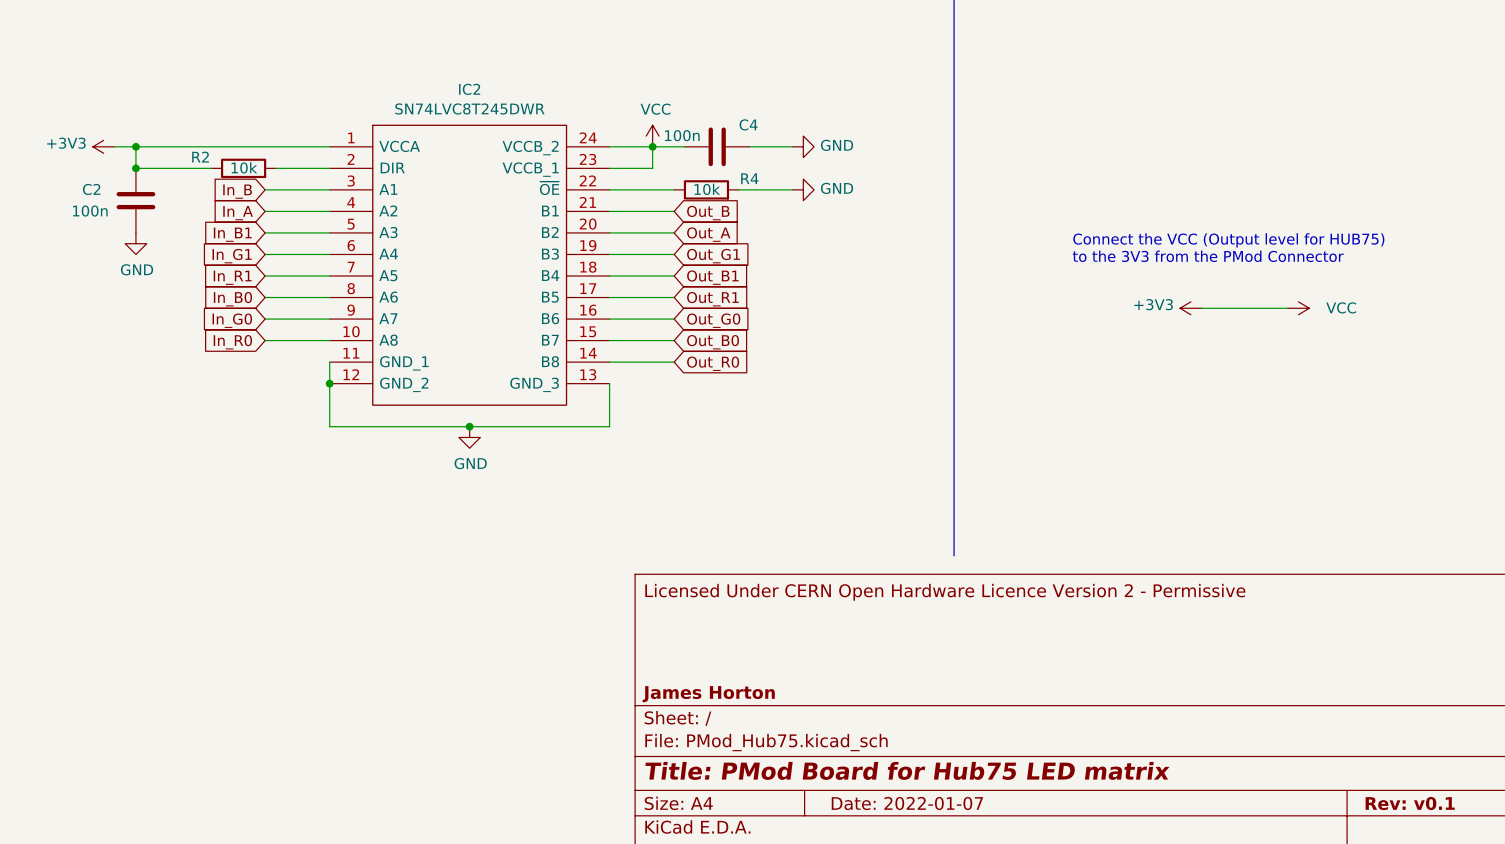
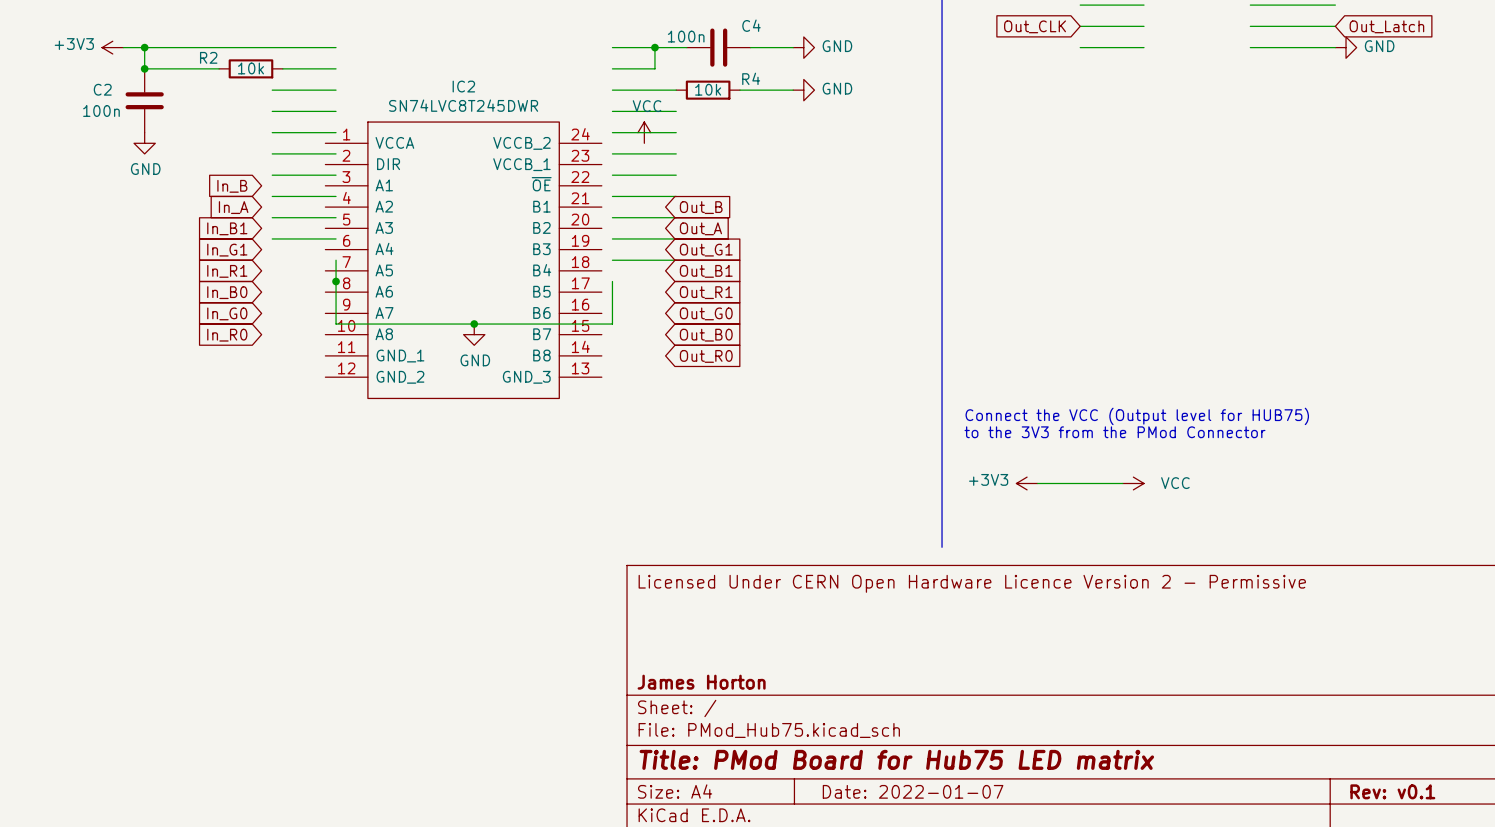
wire: none -> (1080, 5) (1144, 5)
wire: none -> (1250, 5) (1335, 5)
wire: none -> (1080, 26) (1144, 26)
wire: none -> (1250, 26) (1335, 26)
global label: none -> Out_Latch (1386, 26)
global label: none -> Out_CLK (1035, 26)
junction: none -> (144, 47)
junction: none -> (654, 47)
power symbol: none -> GND (803, 47)
wire: none -> (1080, 47) (1144, 47)
wire: none -> (1250, 47) (1335, 47)
power symbol: none -> GND (1346, 47)
junction: none -> (144, 68)
power symbol: none -> GND (803, 90)
power symbol position: +3V3 (103, 146) -> +3V3 (112, 47)
wire: (114, 146) (329, 146) -> (123, 47) (336, 47)
wire: (135, 146) (135, 168) (211, 168) -> (144, 47) (144, 68) (219, 68)
junction: (135, 146) -> none
wire: (609, 146) (684, 146) -> (612, 47) (686, 47)
wire: (652, 146) (652, 168) (609, 168) -> (654, 47) (654, 68) (612, 68)
junction: (652, 146) -> none
C4 position: (717, 146) -> (718, 47)
wire: (749, 146) (792, 146) -> (750, 47) (793, 47)
power symbol: GND (803, 146) -> none
junction: (135, 168) -> none
R2 position: (243, 168) -> (250, 68)
wire: (275, 168) (329, 168) -> (282, 68) (336, 68)
wire: (265, 189) (329, 189) -> (272, 90) (336, 90)
wire: (609, 189) (674, 189) -> (612, 90) (676, 90)
R4 position: (706, 189) -> (708, 90)
wire: (738, 189) (792, 189) -> (740, 90) (793, 90)
power symbol: GND (803, 189) -> none
C2 position: (135, 200) -> (144, 100)
wire: (265, 211) (329, 211) -> (272, 111) (336, 111)
wire: (609, 211) (674, 211) -> (612, 111) (676, 111)
wire: (265, 232) (329, 232) -> (272, 132) (336, 132)
wire: (609, 232) (674, 232) -> (612, 132) (676, 132)
text position: Connect the VCC (Output level for HUB75) (1228, 240) -> Connect the VCC (Output level for HUB75) (1137, 416)
power symbol position: GND (135, 243) -> GND (144, 143)
wire: (265, 254) (329, 254) -> (272, 153) (336, 153)
wire: (609, 254) (674, 254) -> (612, 153) (676, 153)
text position: to the 3V3 from the PMod Connector (1208, 256) -> to the 3V3 from the PMod Connector (1114, 432)
wire: (265, 276) (329, 276) -> (272, 175) (336, 175)
wire: (609, 276) (674, 276) -> (612, 175) (676, 175)
junction: none -> (336, 281)
wire: (265, 297) (329, 297) -> (272, 196) (336, 196)
wire: (609, 297) (674, 297) -> (612, 196) (676, 196)
power symbol: +3V3 (1190, 308) -> none
wire: (1201, 308) (1287, 308) -> none
power symbol: VCC (1298, 308) -> none
wire: (265, 319) (329, 319) -> (272, 217) (336, 217)
wire: (609, 319) (674, 319) -> (612, 217) (676, 217)
junction: none -> (474, 324)
wire: (265, 340) (329, 340) -> (272, 238) (336, 238)
wire: (609, 340) (674, 340) -> (612, 238) (676, 238)
wire: (329, 362) (329, 426) (609, 426) (609, 383) -> (336, 260) (336, 324) (612, 324) (612, 281)
wire: (609, 362) (674, 362) -> (612, 260) (676, 260)
junction: (329, 383) -> none
junction: (469, 426) -> none
power symbol position: GND (469, 437) -> GND (474, 334)
power symbol: none -> +3V3 (1027, 483)
wire: none -> (1037, 483) (1122, 483)
power symbol: none -> VCC (1133, 483)

